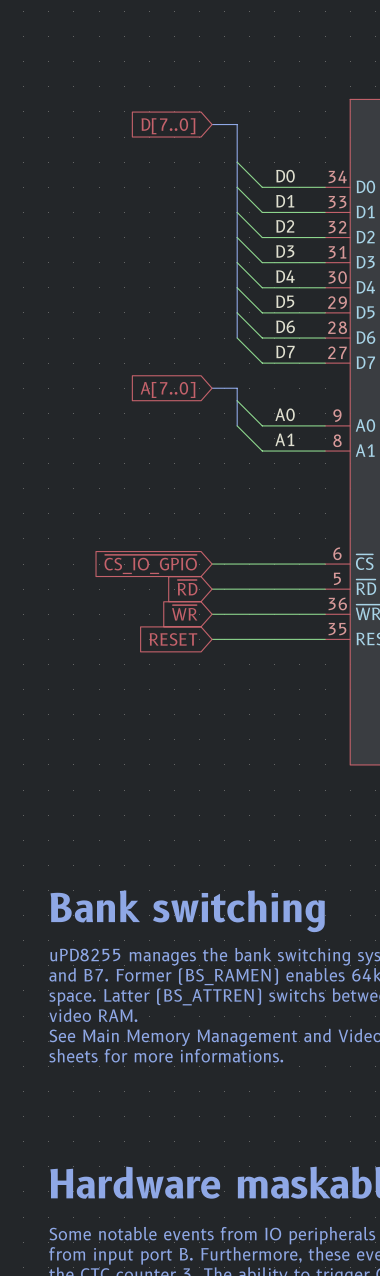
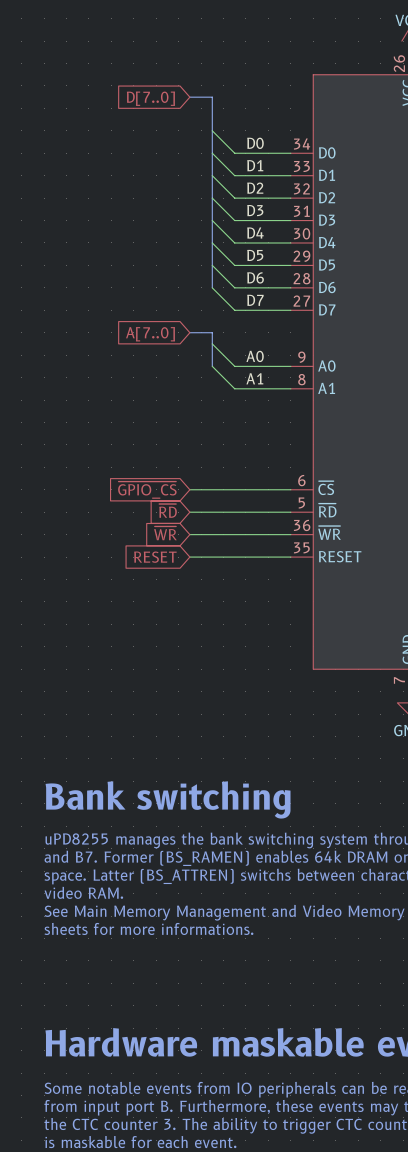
global label: ~{CS_IO_GPIO} (150, 564) -> ~{GPIO_CS} (147, 490)

